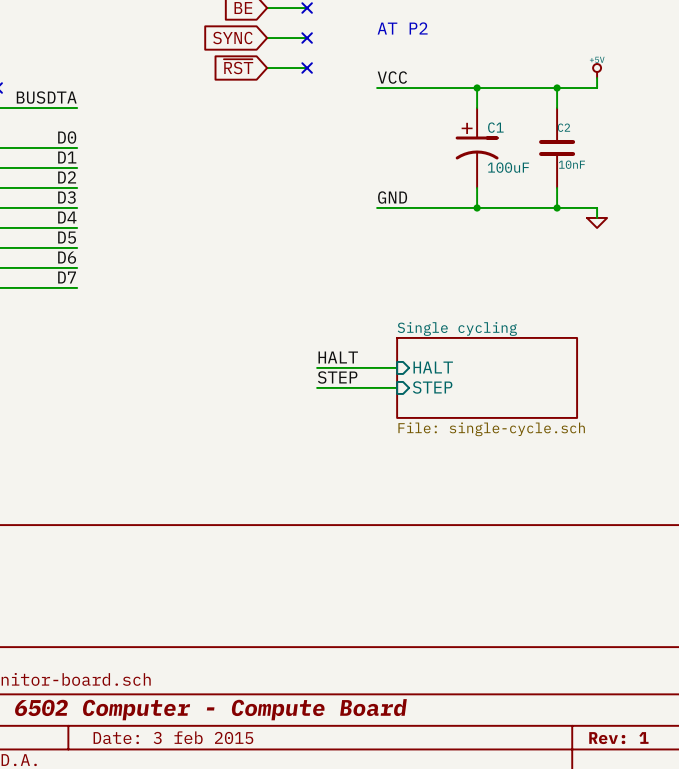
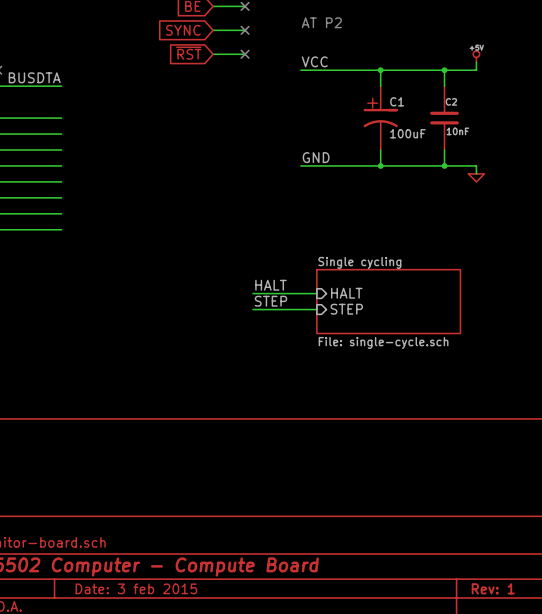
label: D0 (67, 137) -> none
label: D1 (67, 157) -> none
label: D2 (67, 177) -> none
label: D3 (66, 197) -> none
label: D4 (67, 217) -> none
label: D5 (67, 237) -> none
label: D6 (67, 257) -> none
label: D7 (67, 277) -> none

